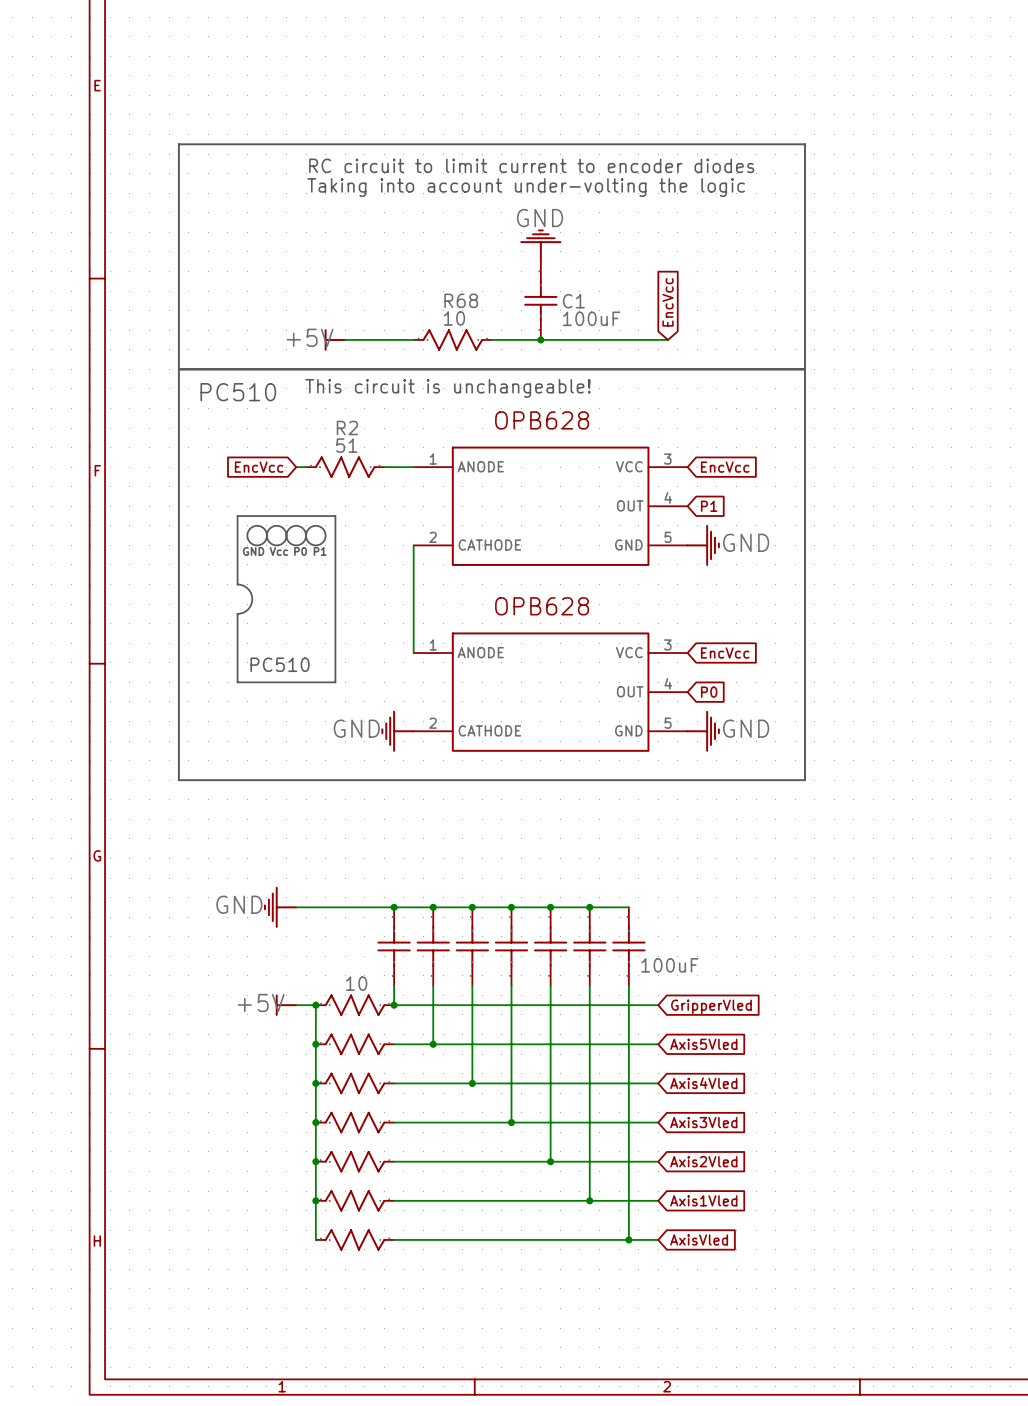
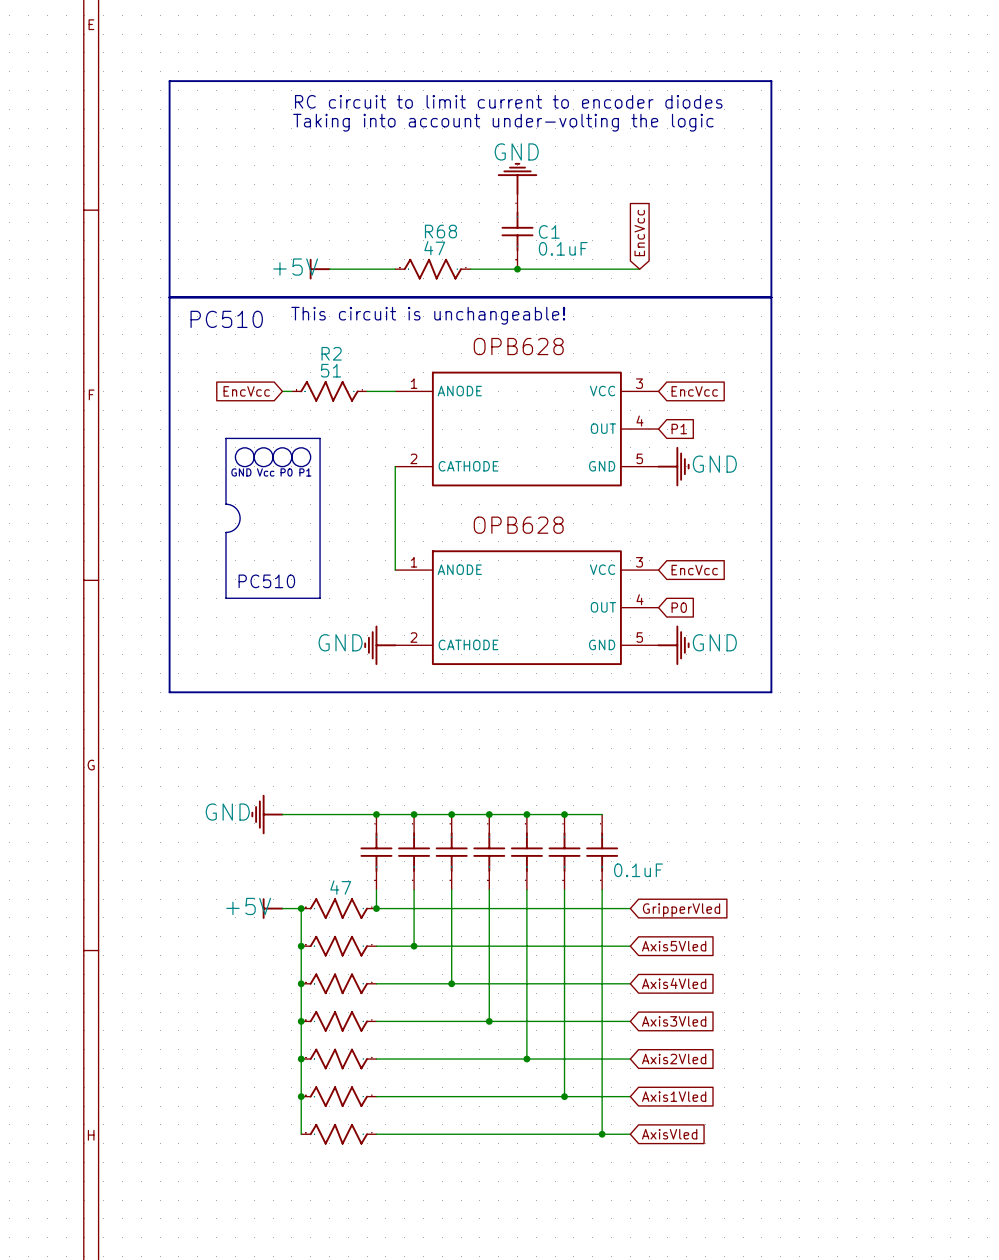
R68 value: 10 (454, 318) -> 47 (434, 248)
C1 value: 100uF (591, 318) -> 0.1uF (563, 248)
part value: 100uF (669, 965) -> 0.1uF (638, 870)
part value: 10 (356, 983) -> 47 (340, 887)

